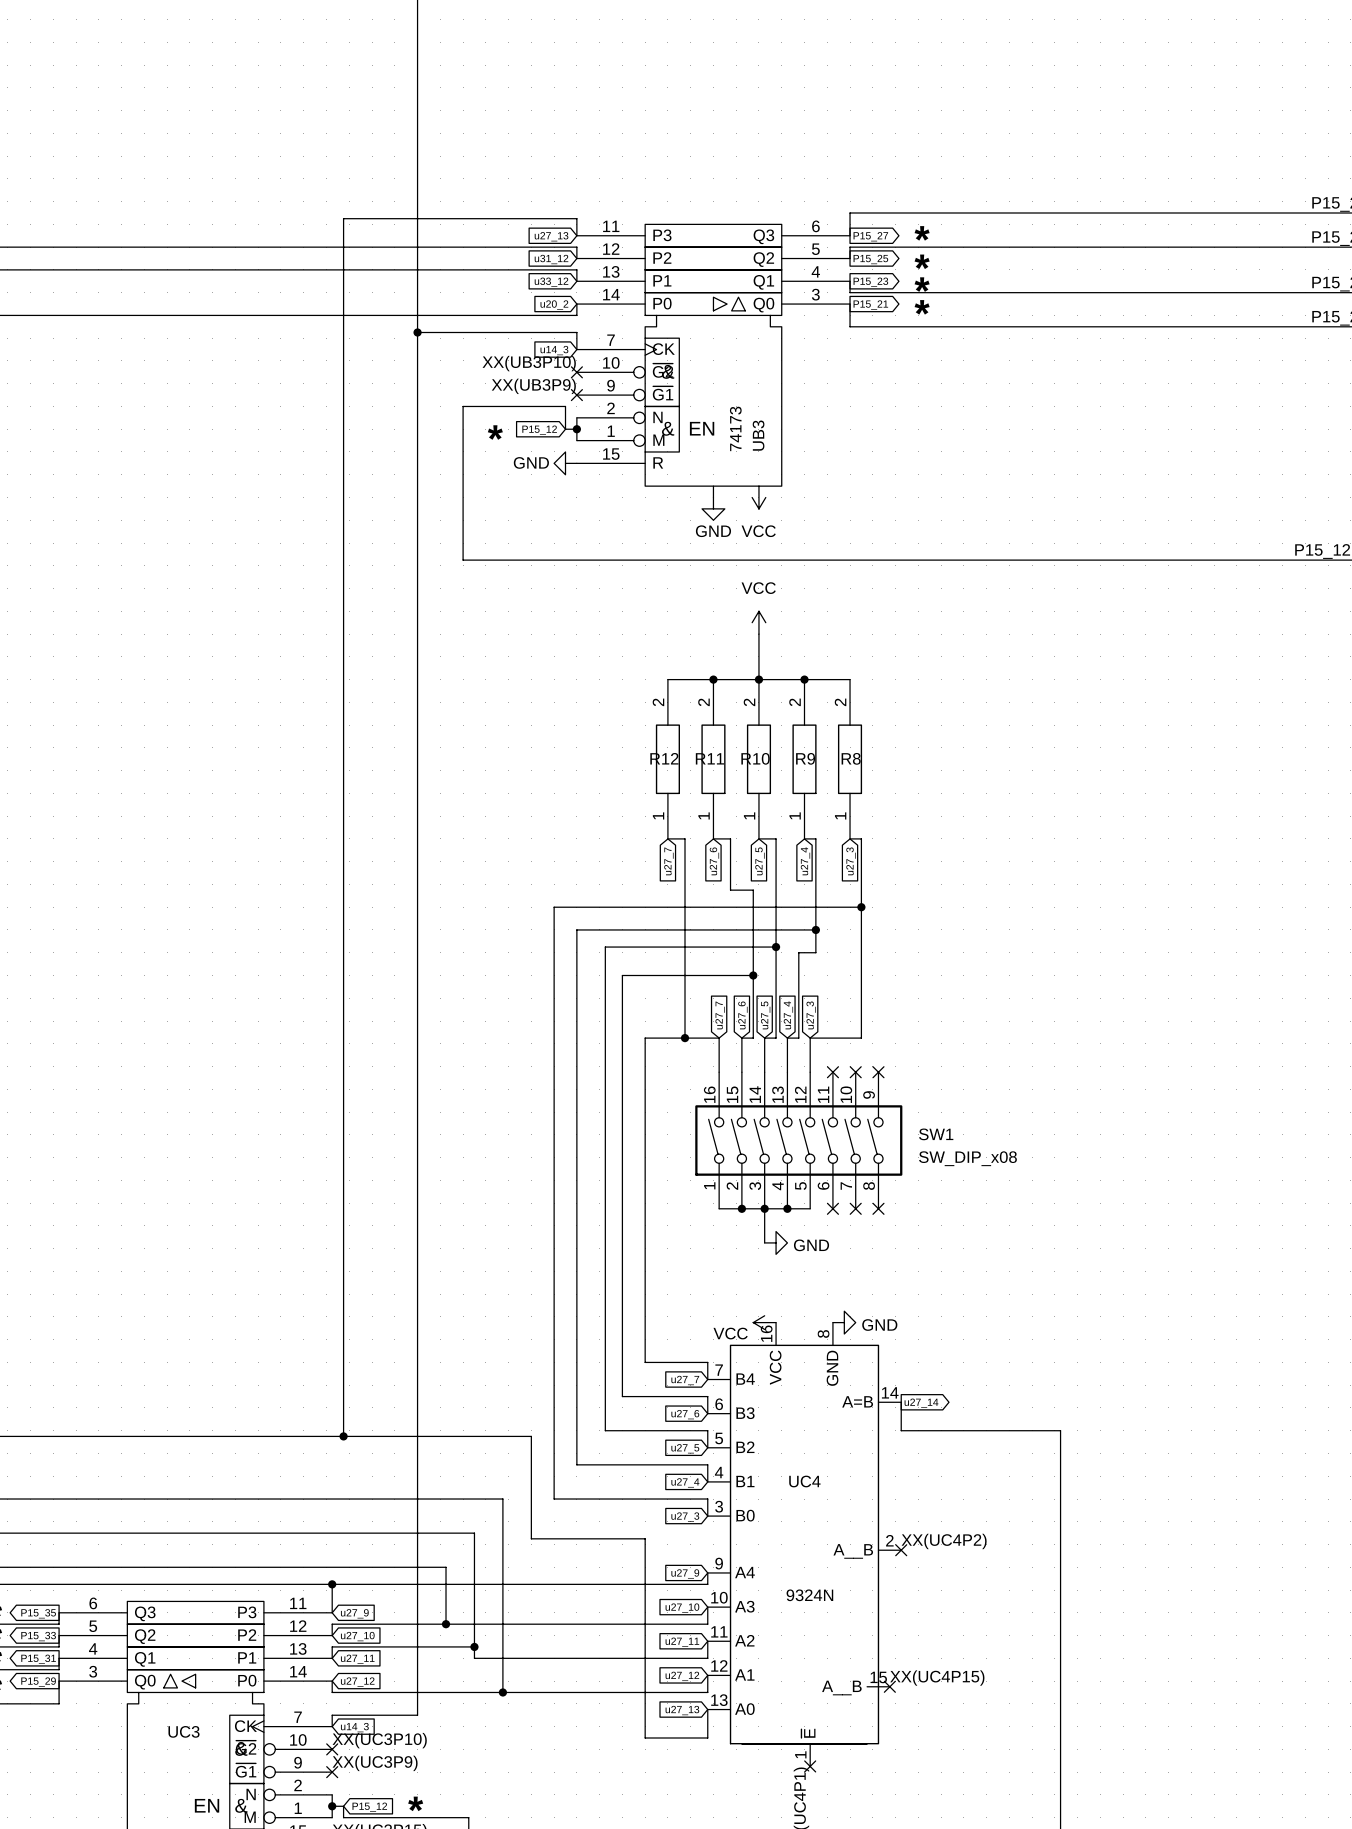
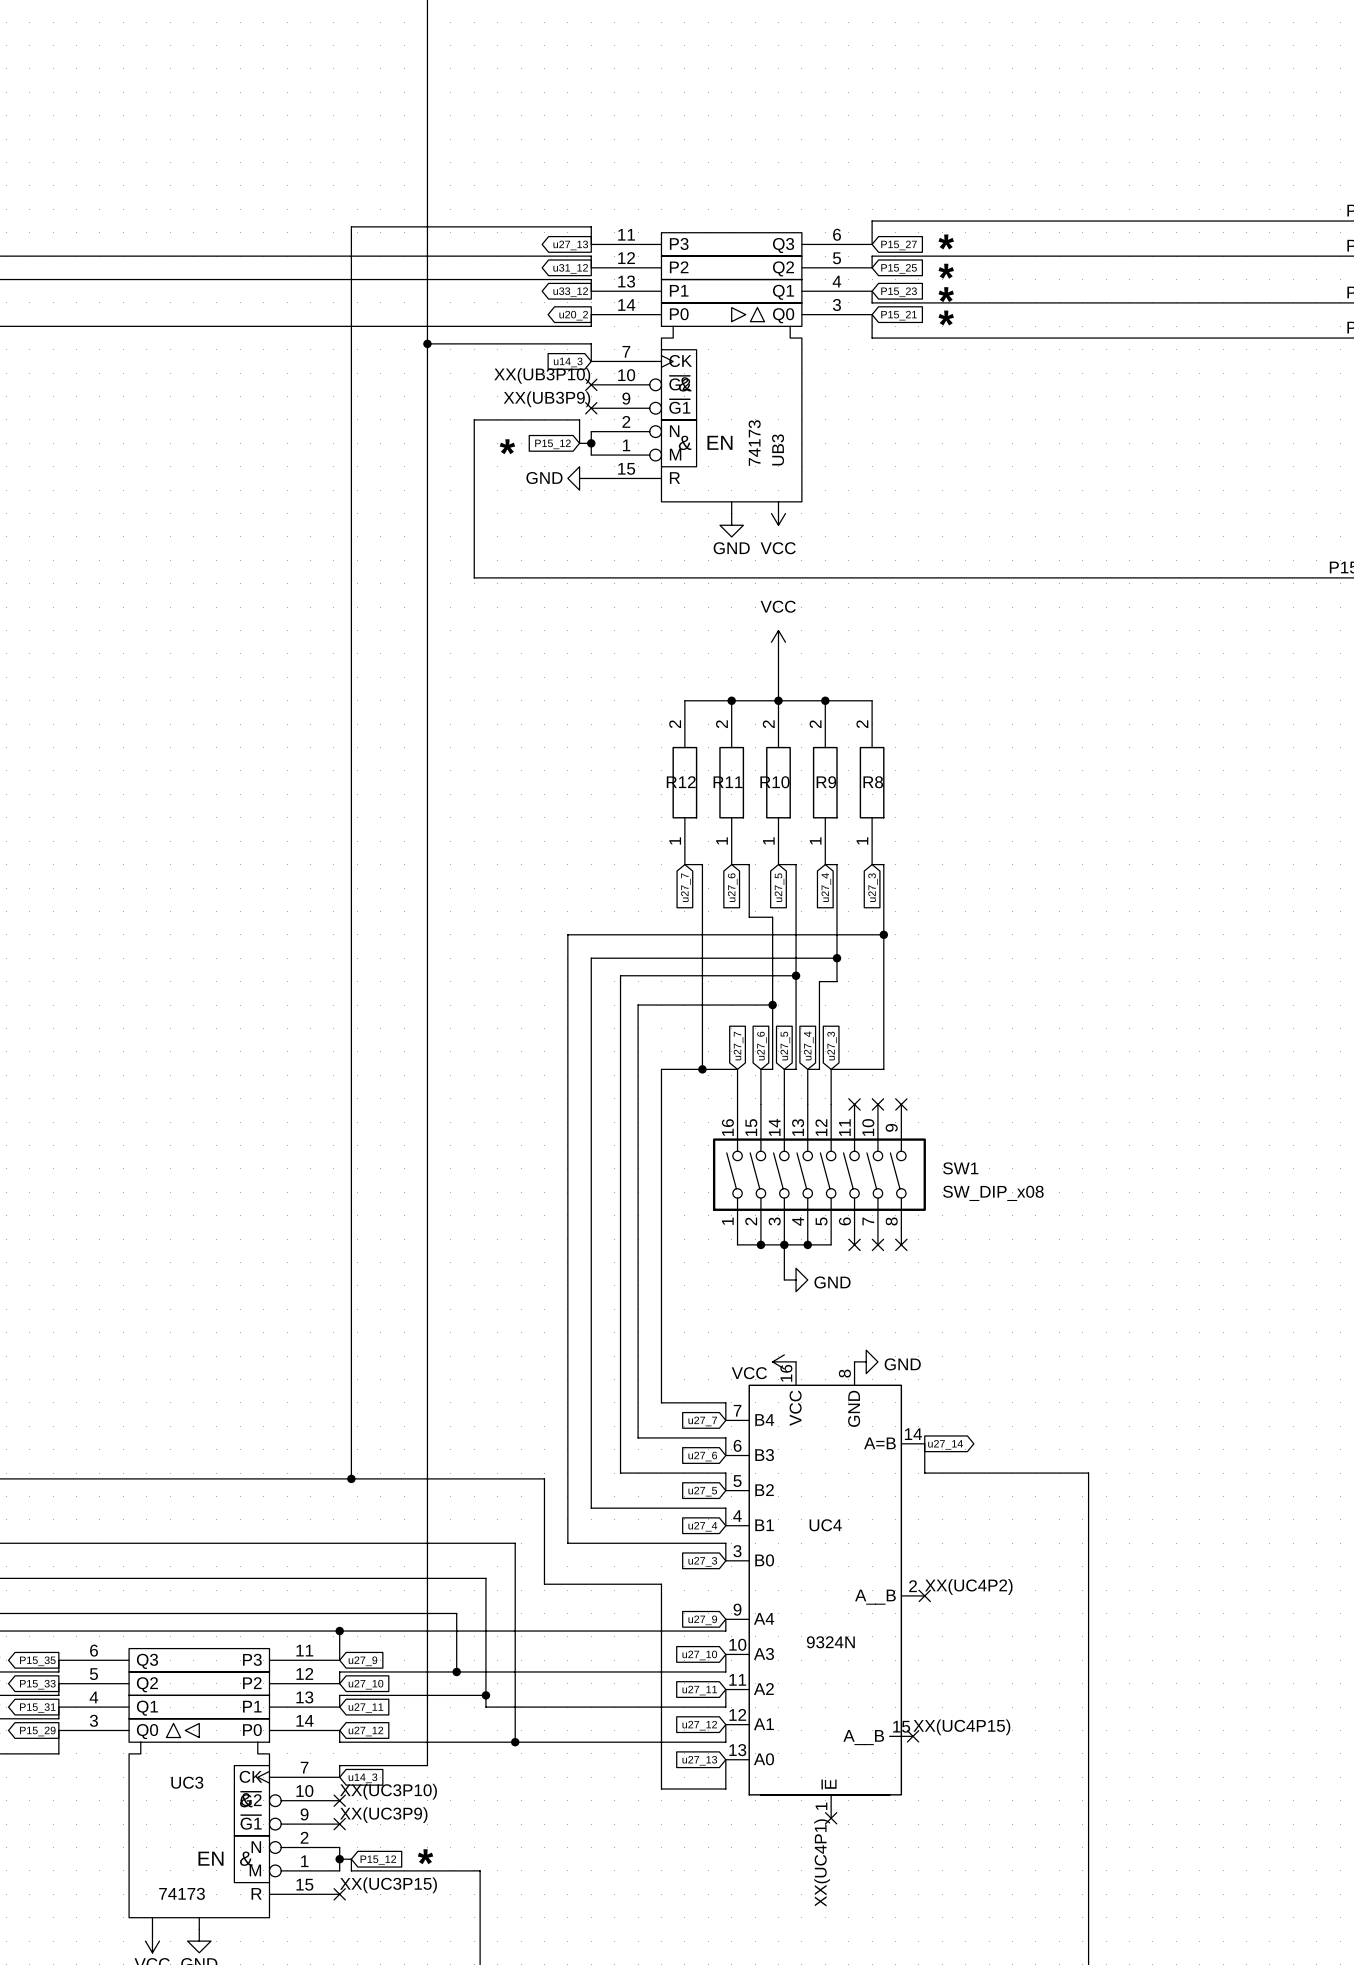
global label shape: input (551, 236) -> output (570, 245)
global label shape: output (870, 236) -> input (899, 245)
global label shape: input (551, 259) -> output (570, 268)
global label shape: output (870, 259) -> input (899, 268)
global label shape: input (551, 282) -> output (570, 292)
global label shape: output (870, 282) -> input (899, 292)
global label shape: input (554, 305) -> output (573, 315)
global label shape: output (870, 305) -> input (899, 315)

